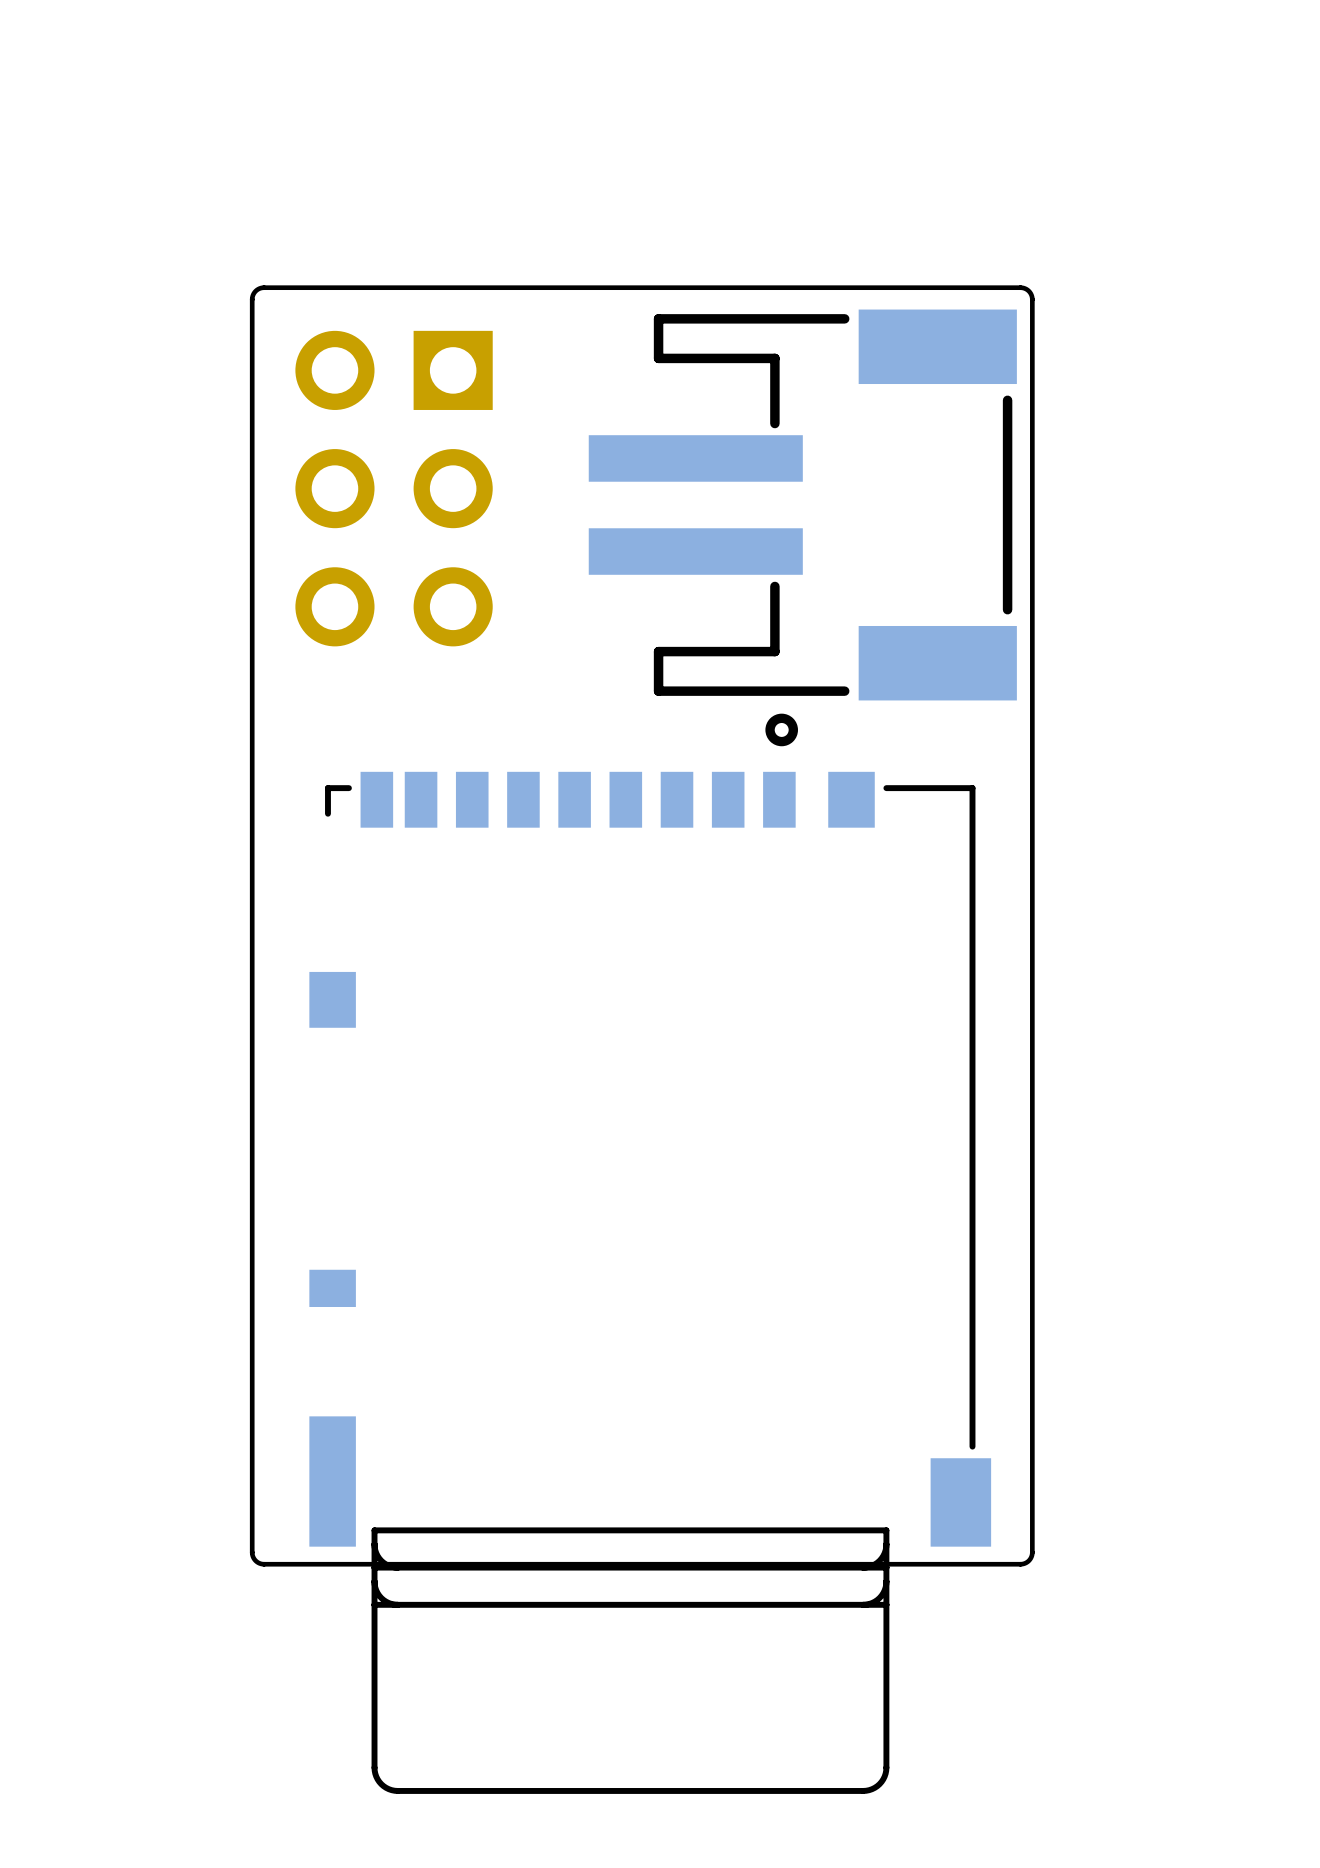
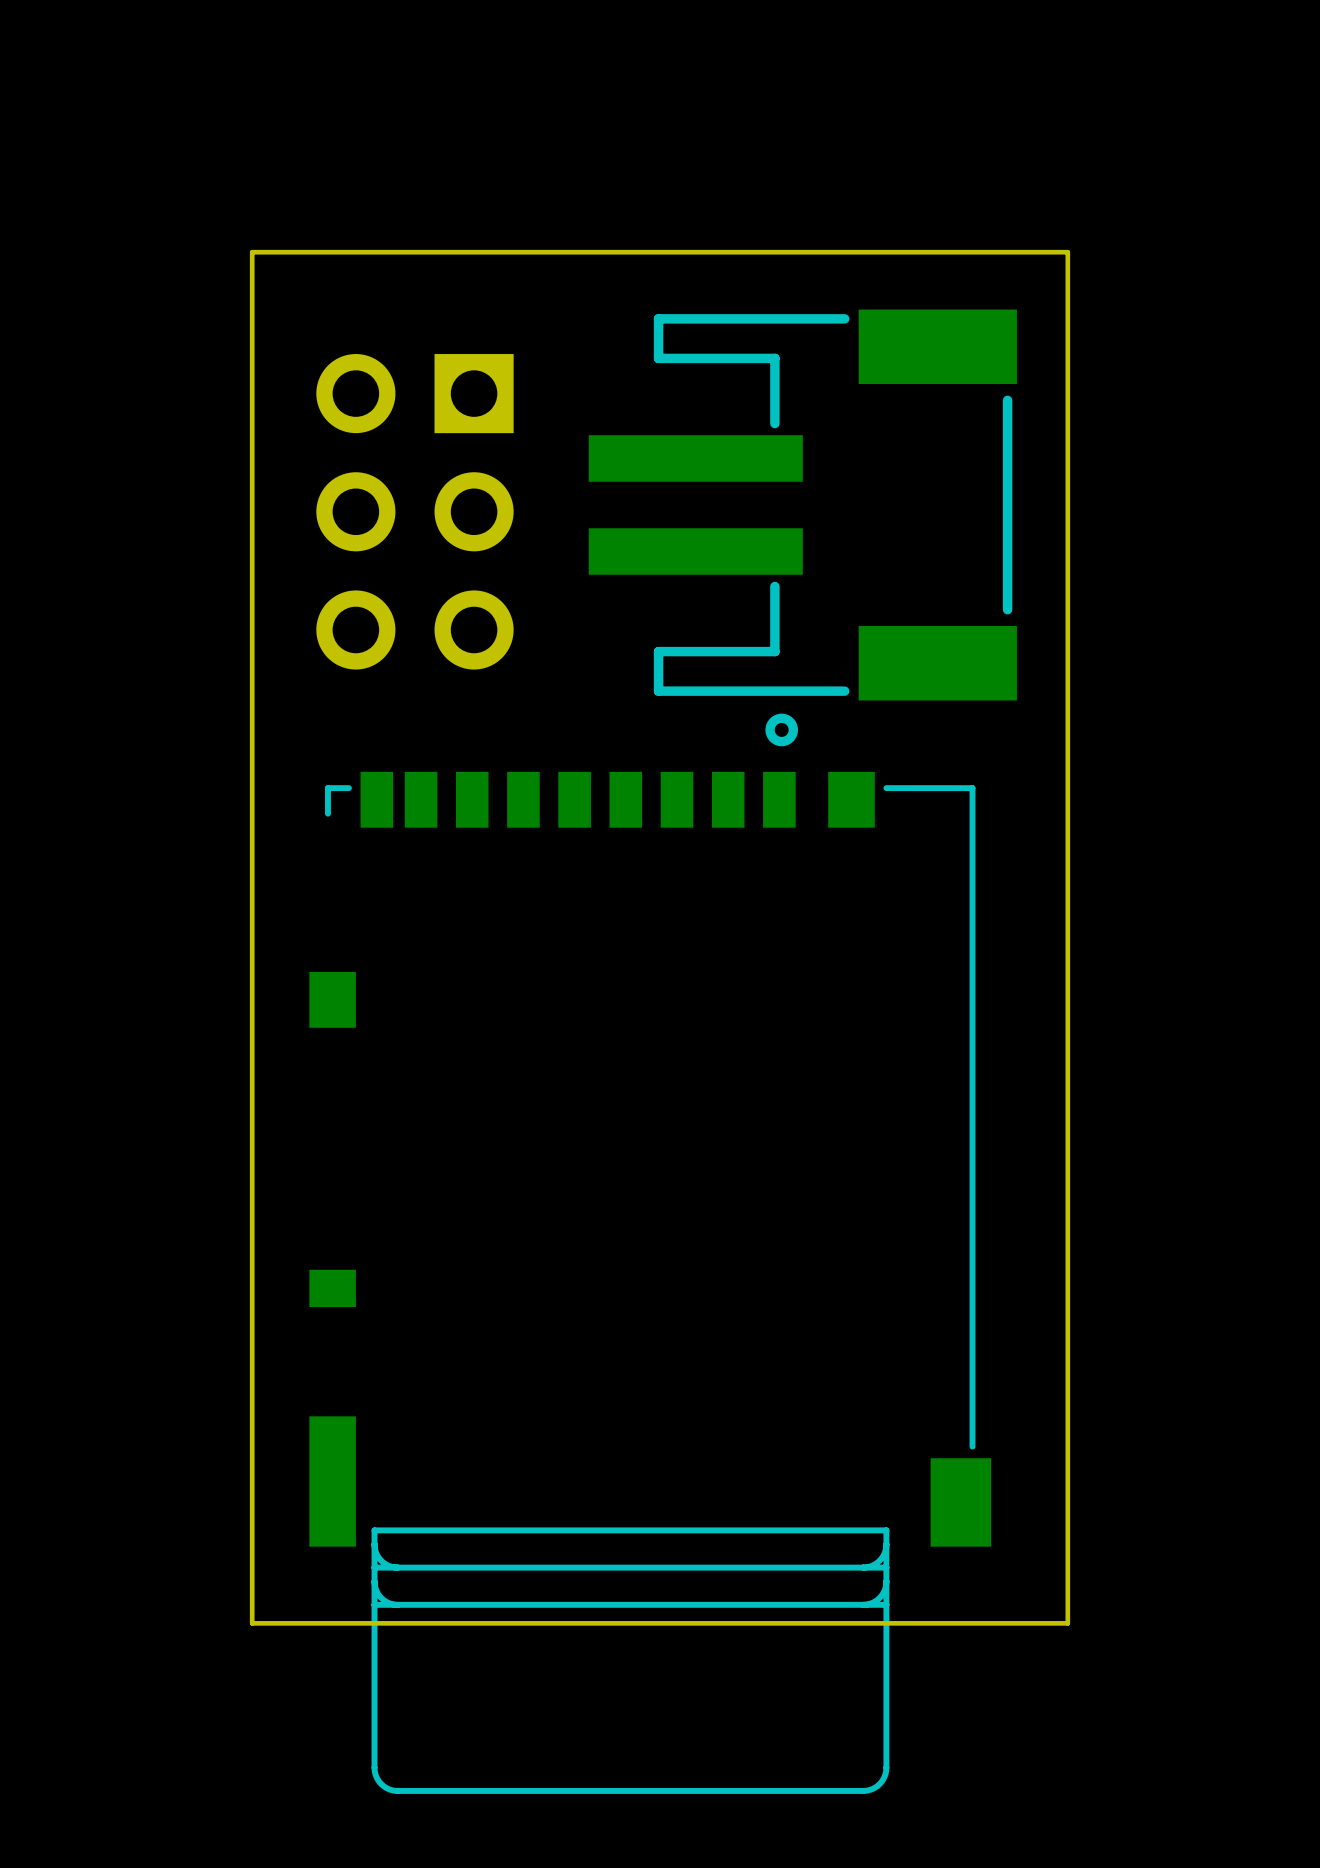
board edge: (252, 299) (255, 291) (264, 287) (1020, 287) (1028, 291) (1032, 299) (1032, 1552) (1030, 1558) (1026, 1562) (1020, 1564) (264, 1564) (255, 1560) (252, 1552) -> (252, 299) (252, 252) (1067, 252) (1067, 1623) (252, 1623) (252, 1552)
part position: (394, 488) -> (414, 511)

